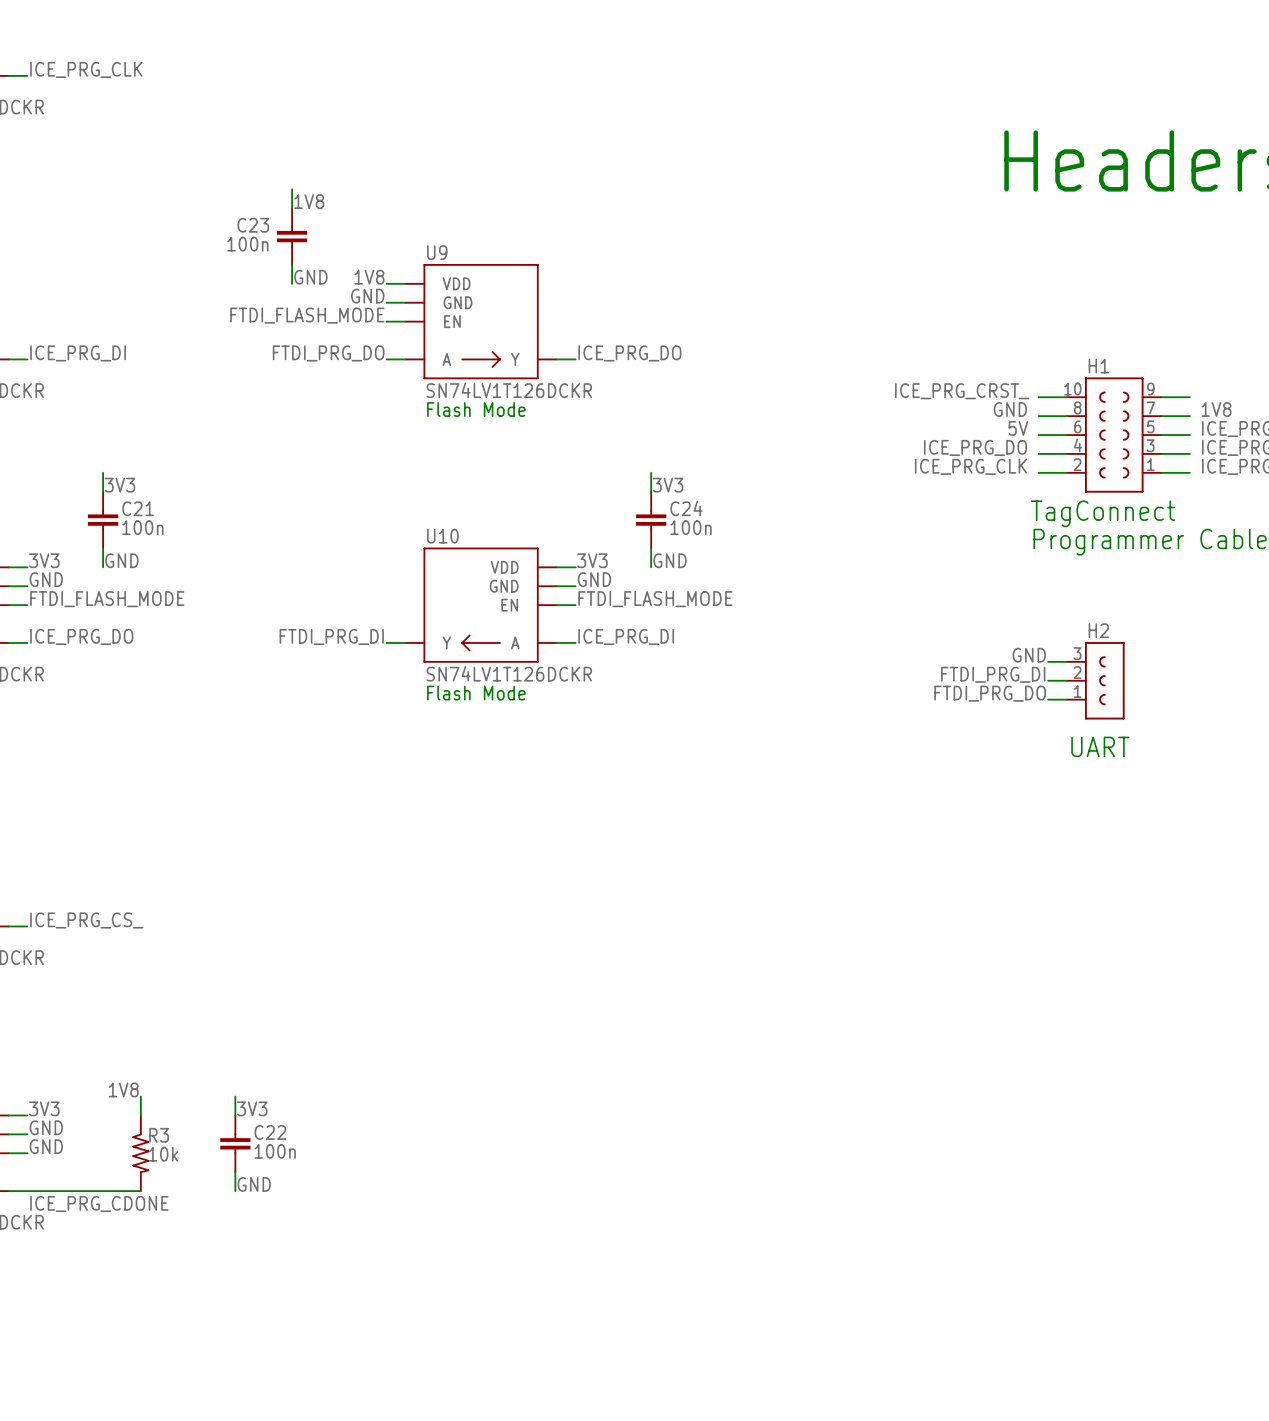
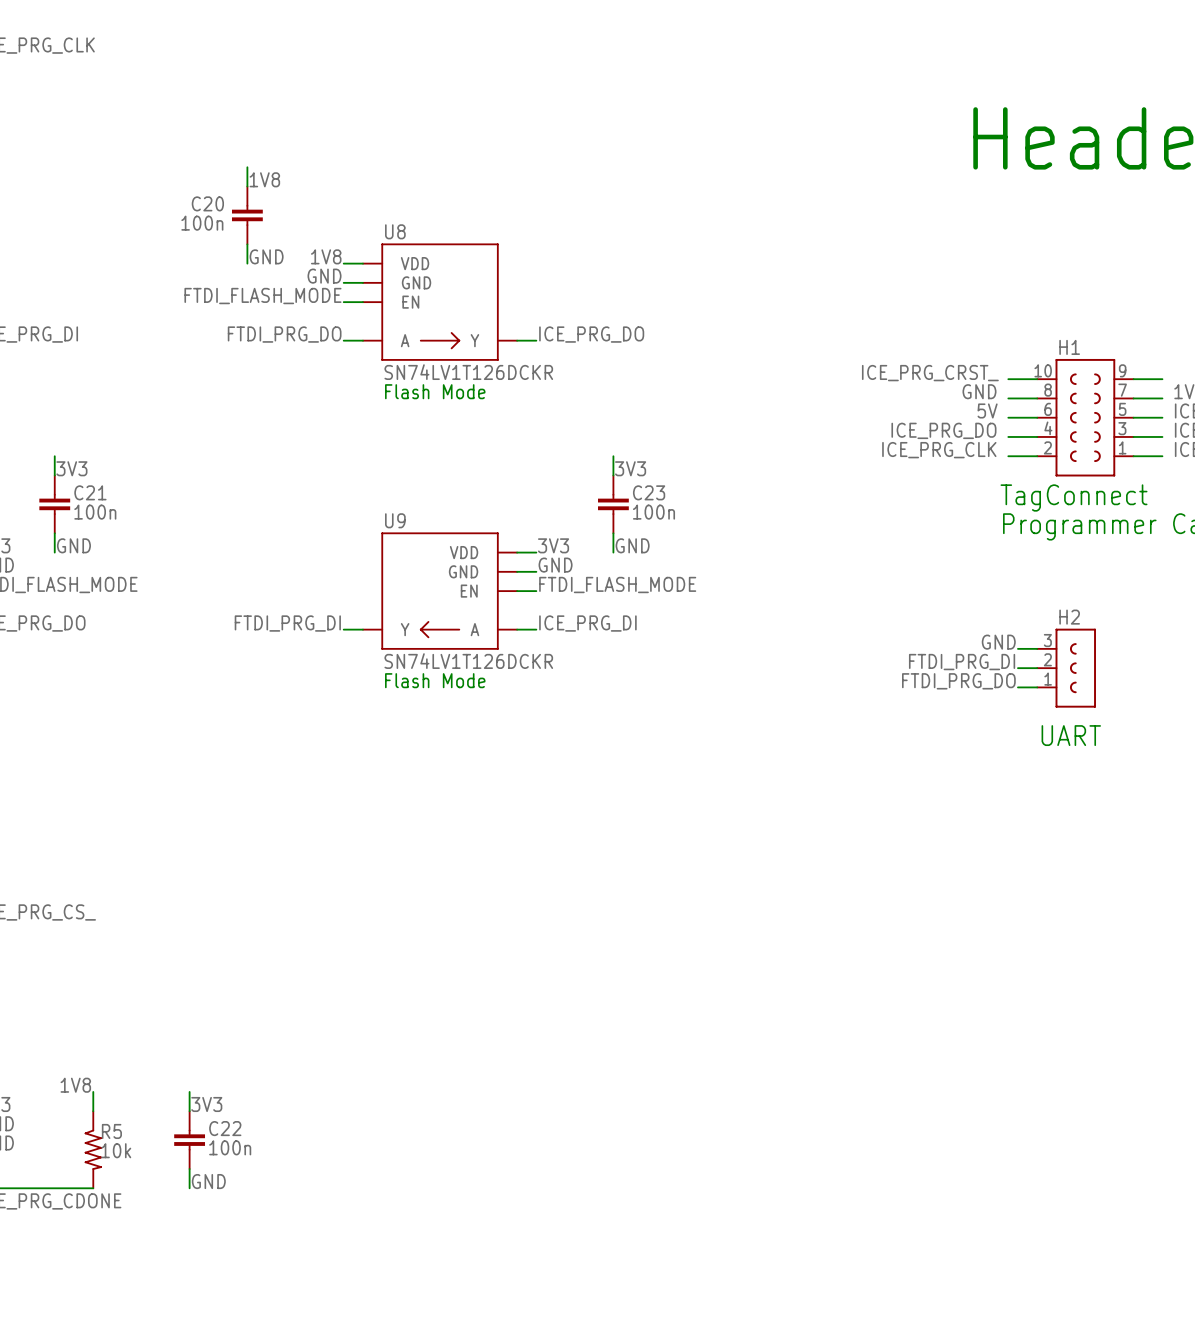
C23 name: C23 (253, 225) -> C20 (207, 203)
U9 name: U9 (437, 252) -> U8 (395, 231)
C24 name: C24 (686, 508) -> C23 (649, 492)
U10 name: U10 (442, 536) -> U9 (395, 520)
R3 name: R3 (159, 1135) -> R5 (111, 1131)

